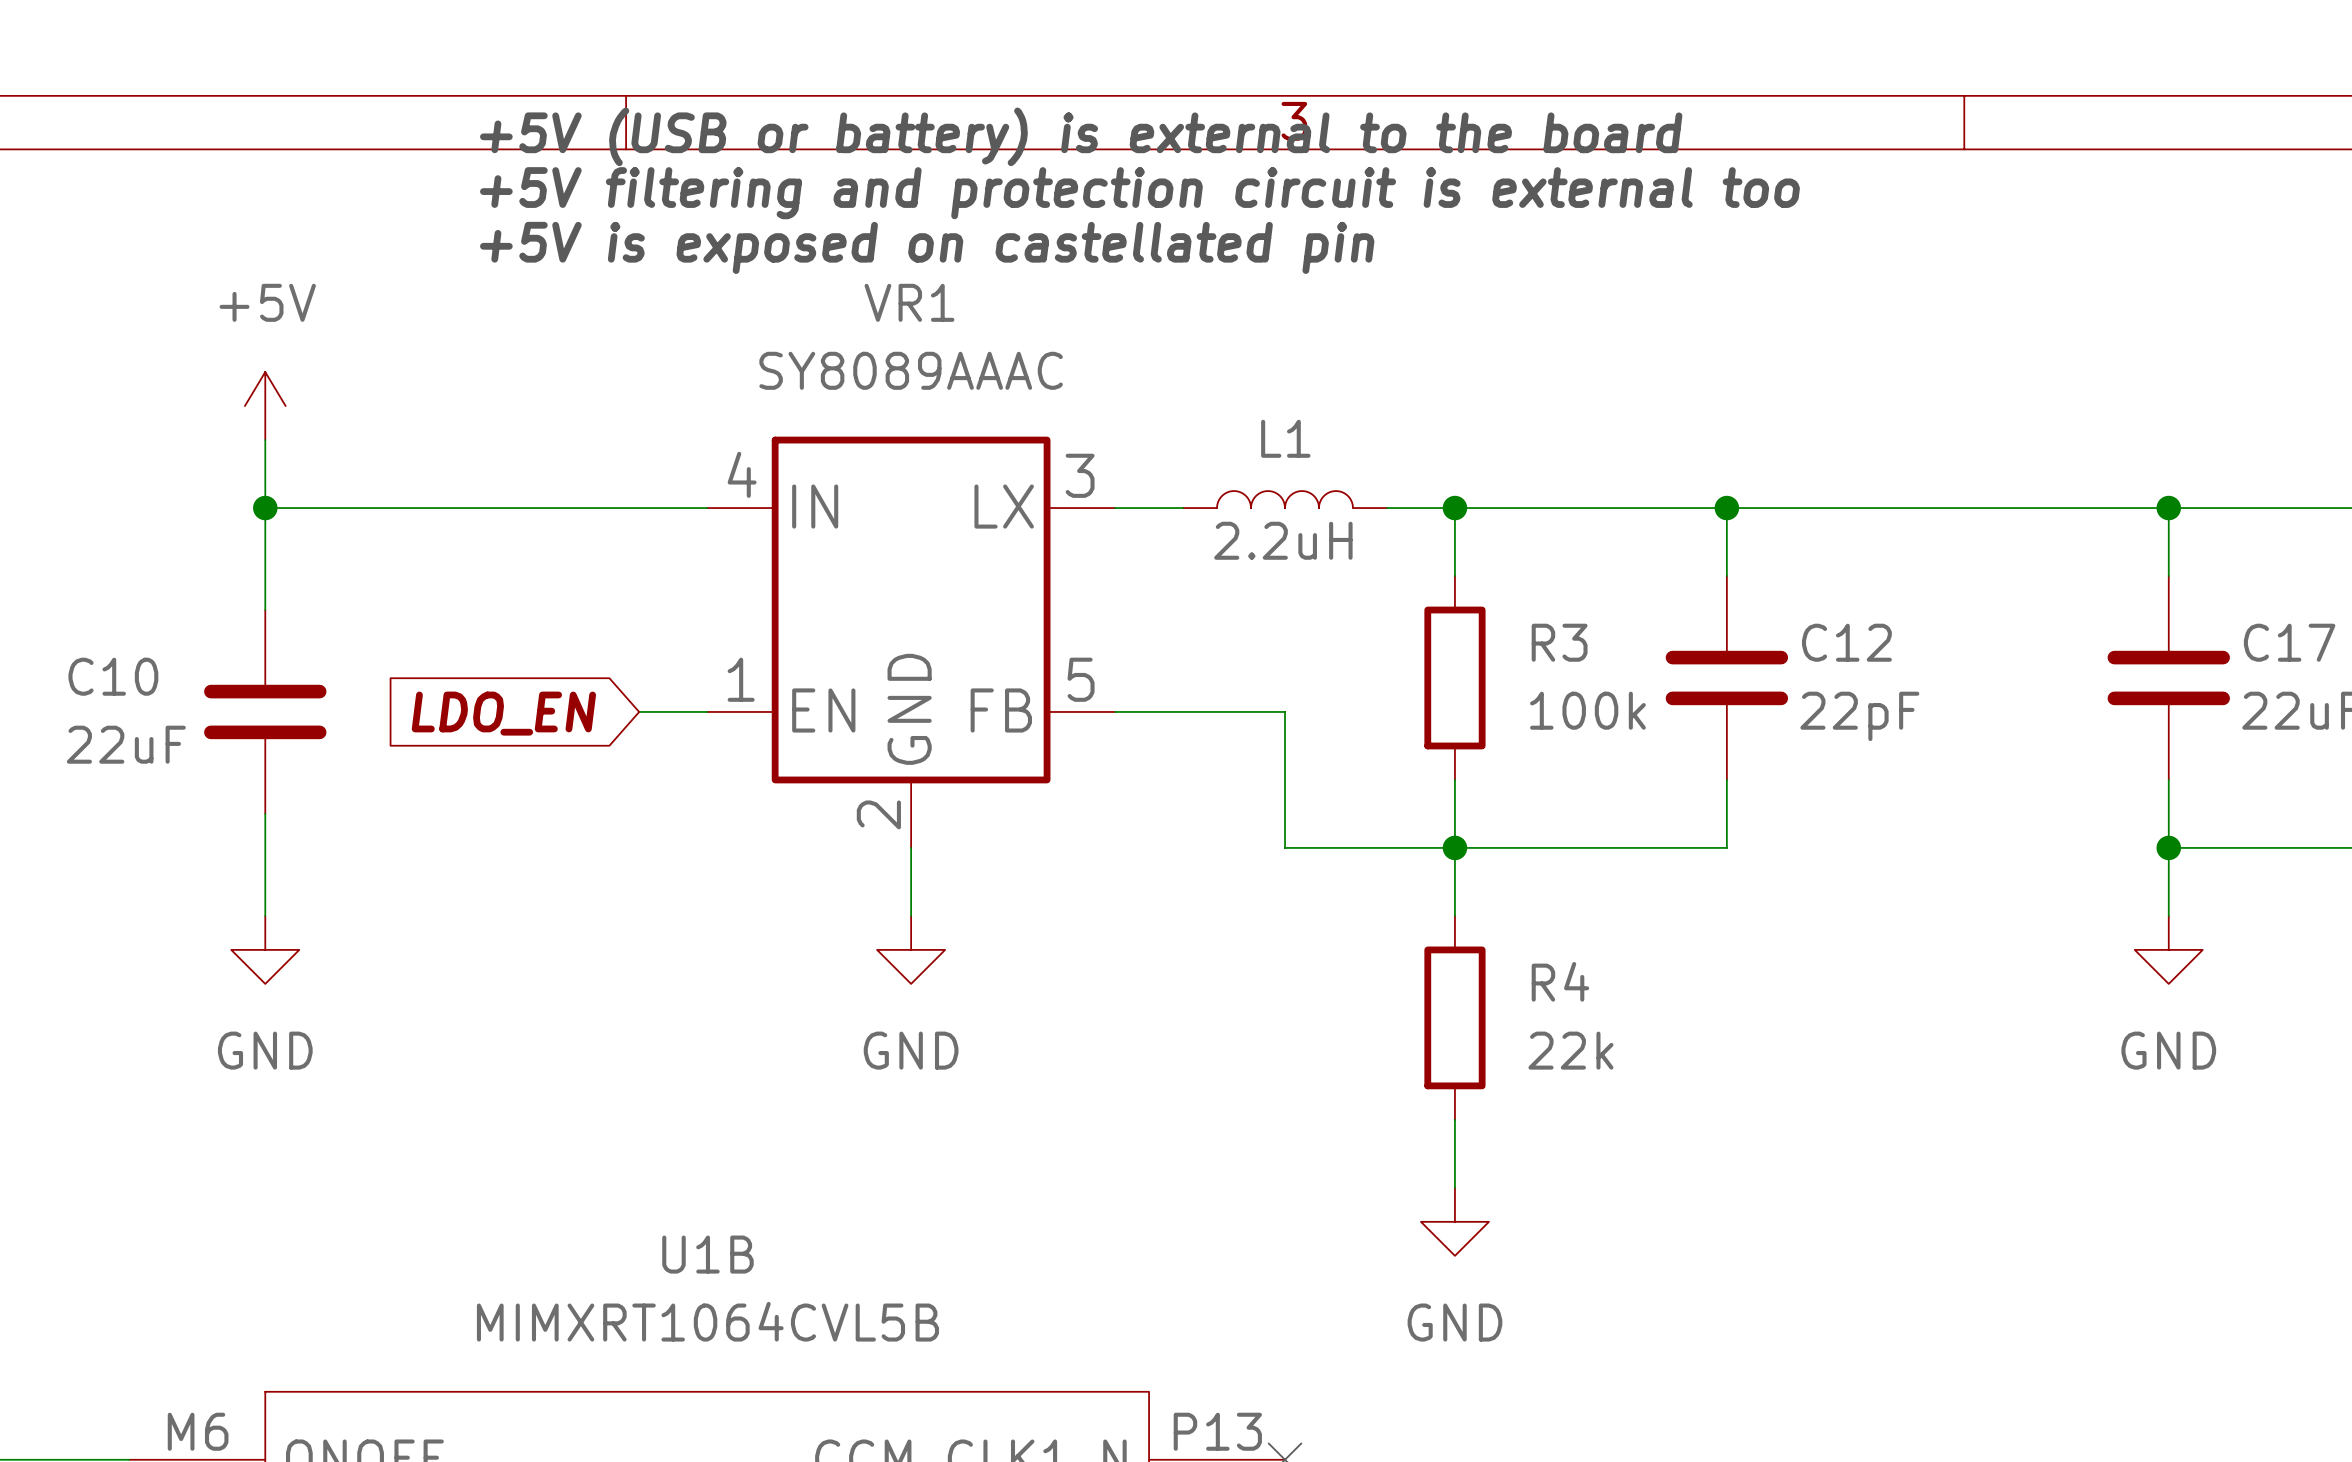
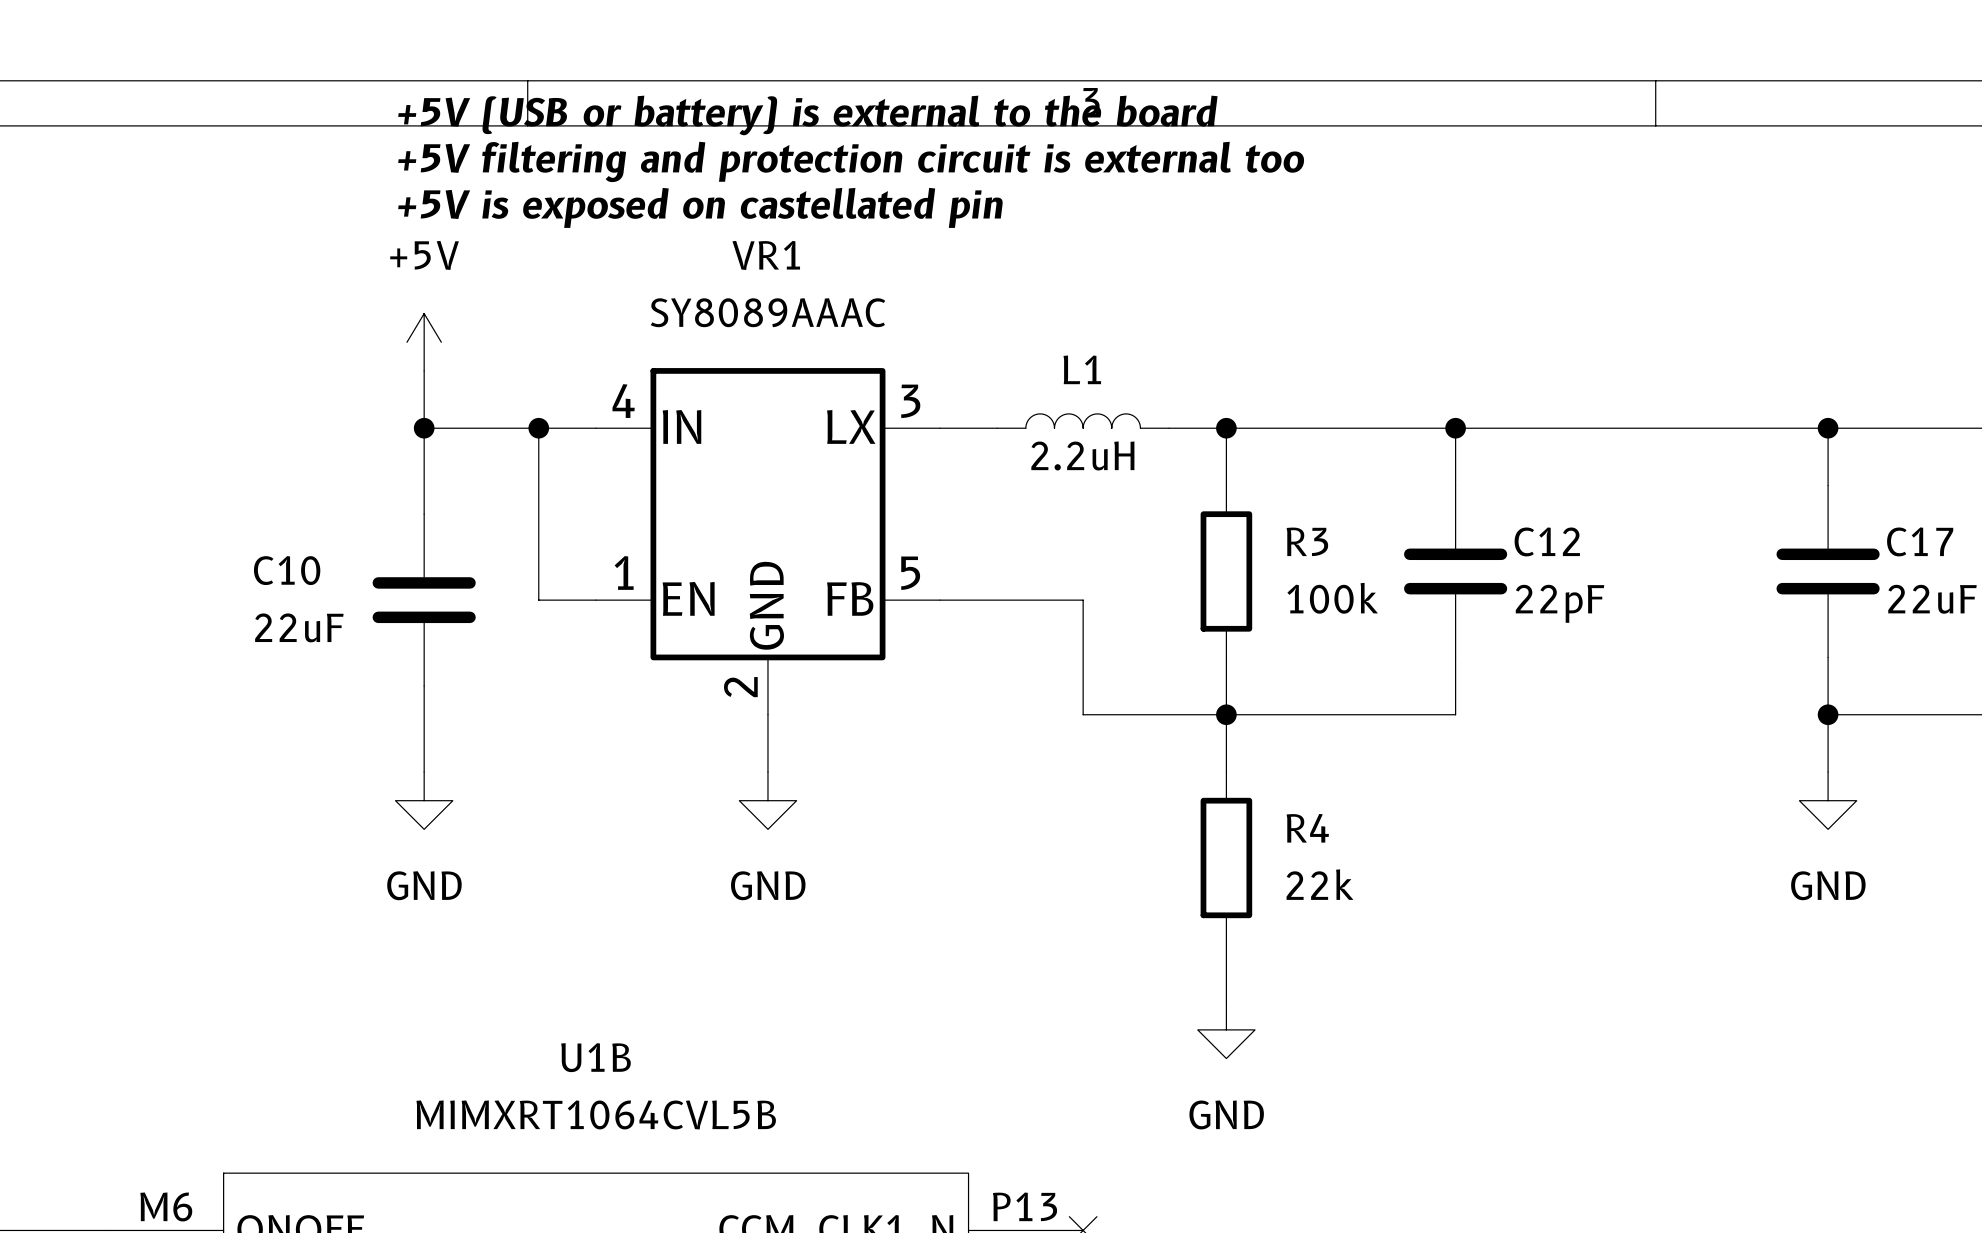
power symbol position: +5V (265, 406) -> +5V (424, 342)
wire: (265, 440) (265, 610) -> (424, 370) (424, 514)
wire: (265, 508) (503, 508) -> none
junction: (265, 508) -> none
junction: none -> (424, 428)
wire: none -> (538, 428) (538, 600)
junction: none -> (538, 428)
C10 position: (265, 711) -> (424, 600)
global label: LDO_EN (503, 713) -> none
wire: (265, 813) (265, 915) -> (424, 686) (424, 772)
power symbol position: GND (265, 949) -> GND (424, 800)

